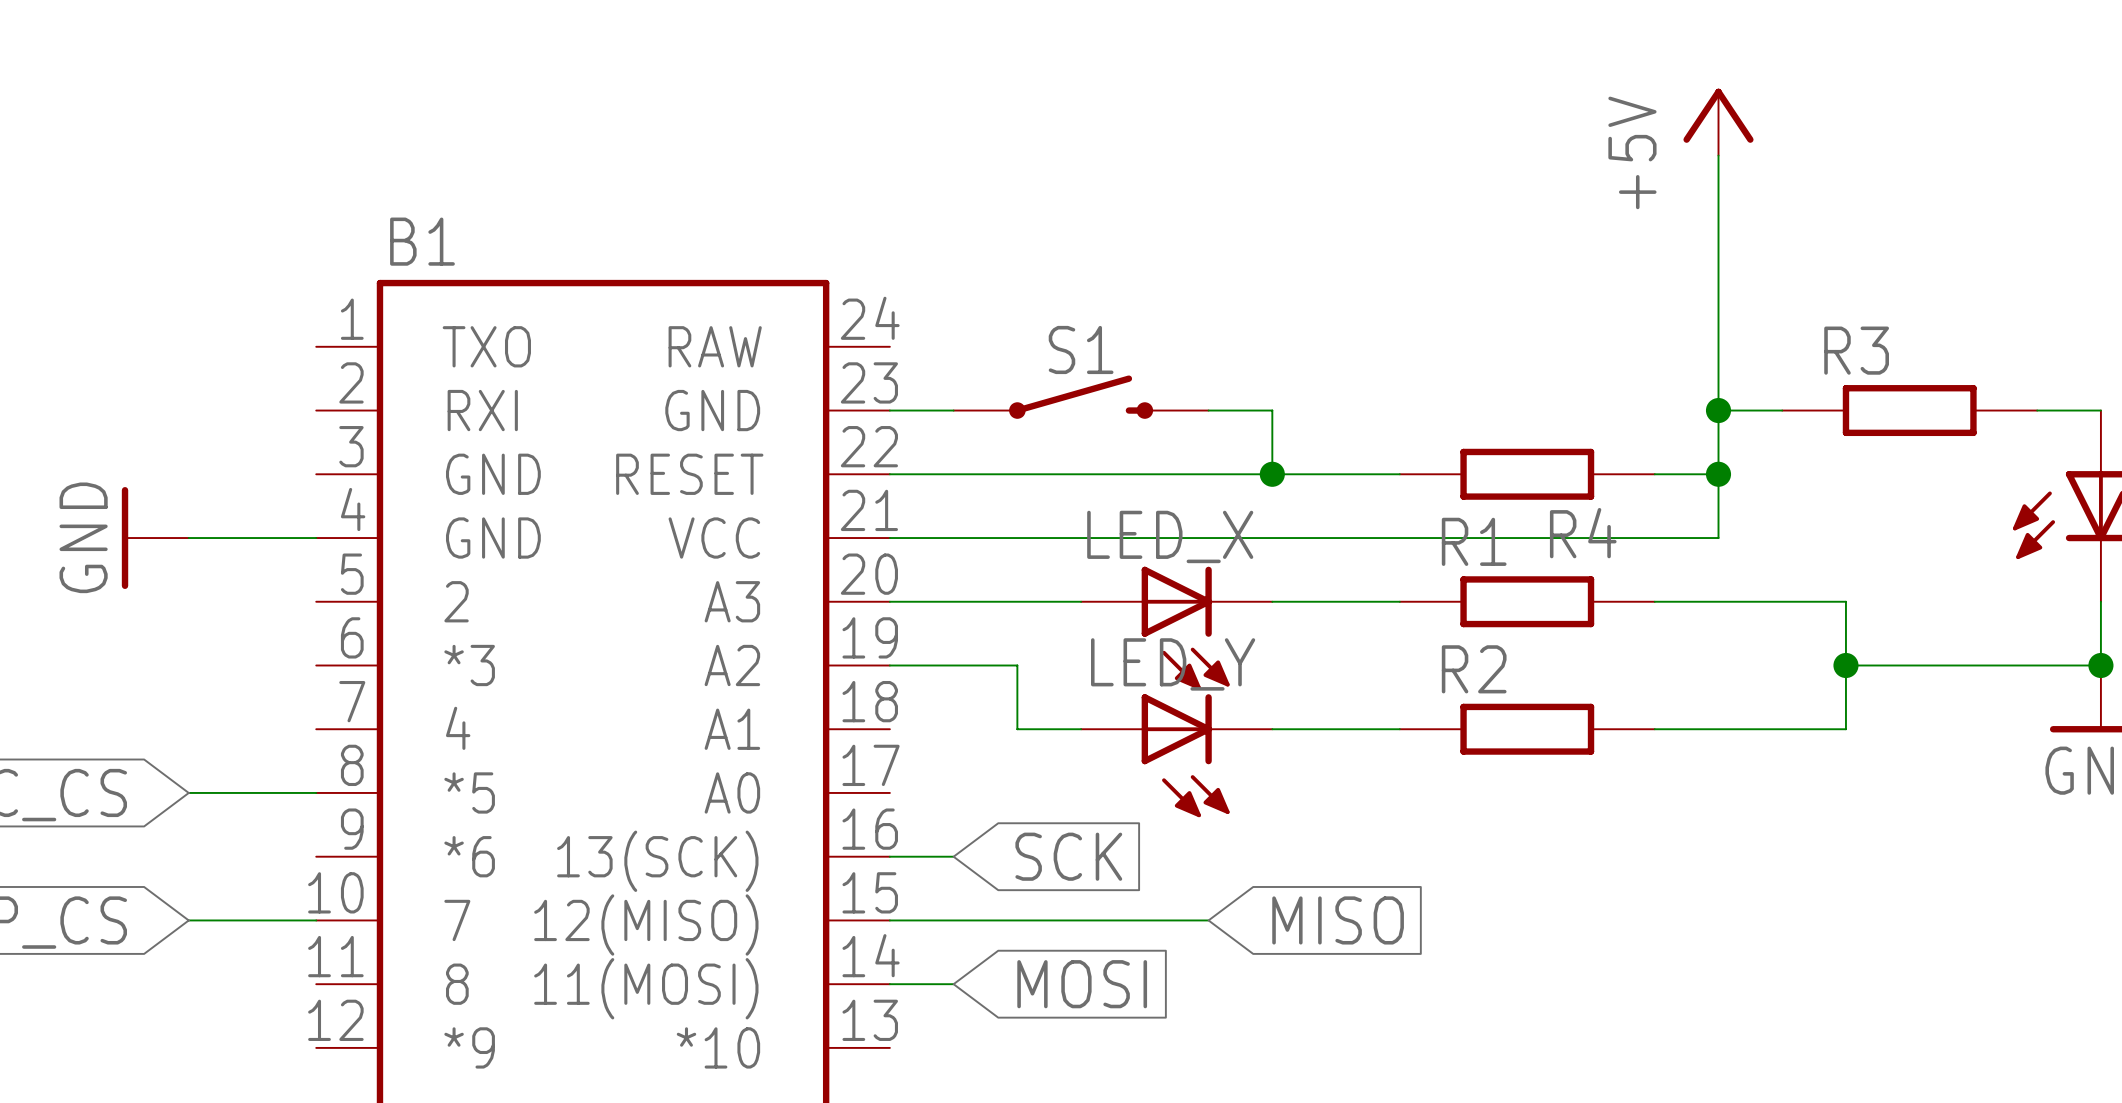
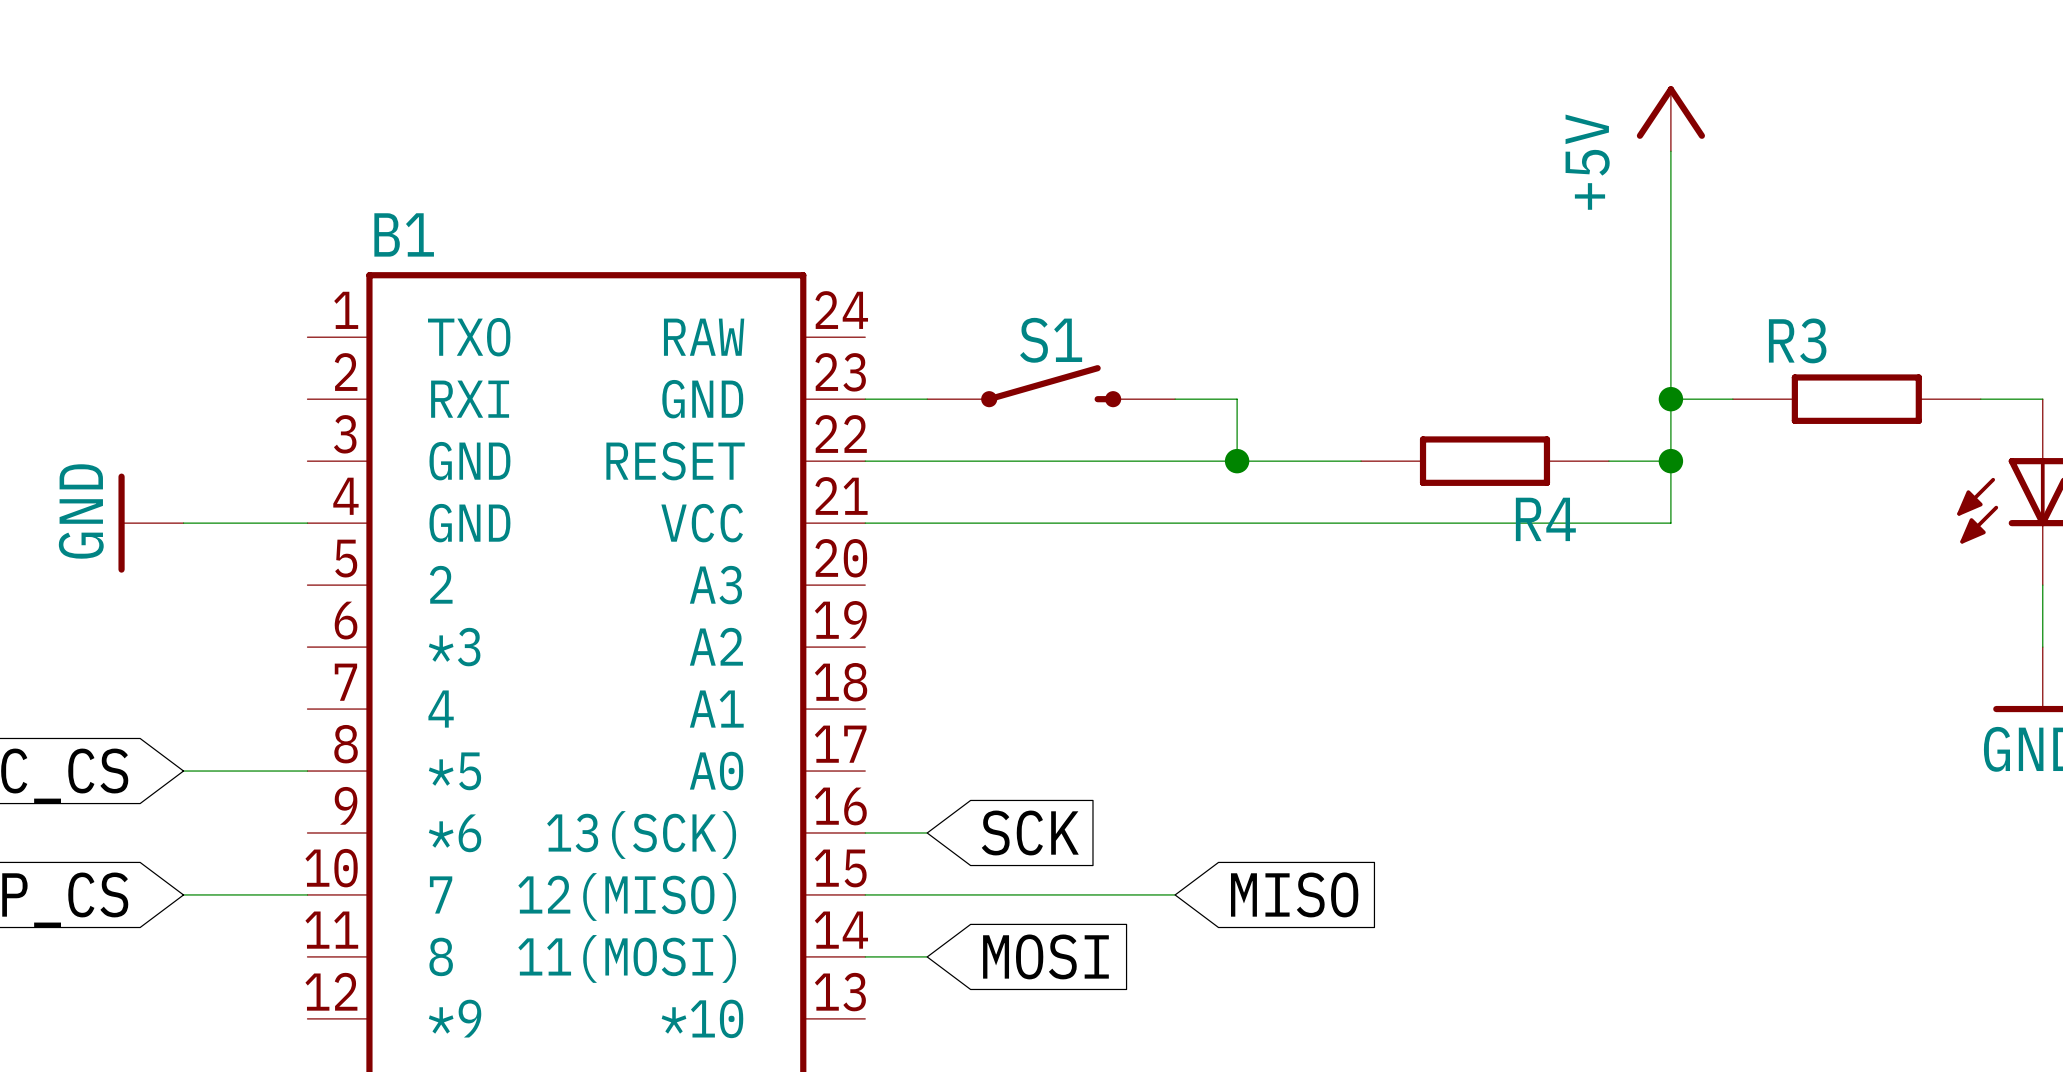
wire: (889, 601) (1081, 601) -> none
wire: (1272, 601) (1399, 601) -> none
R1: (1527, 601) -> none
wire: (1654, 601) (1845, 601) (1845, 729) (1654, 729) -> none
LED_X: (1176, 628) -> none
wire: (889, 665) (1017, 665) (1017, 729) (1081, 729) -> none
wire: (1845, 665) (2100, 665) -> none
junction: (1845, 665) -> none
junction: (2100, 665) -> none
wire: (1272, 729) (1399, 729) -> none
R2: (1527, 729) -> none
LED_Y: (1176, 755) -> none

